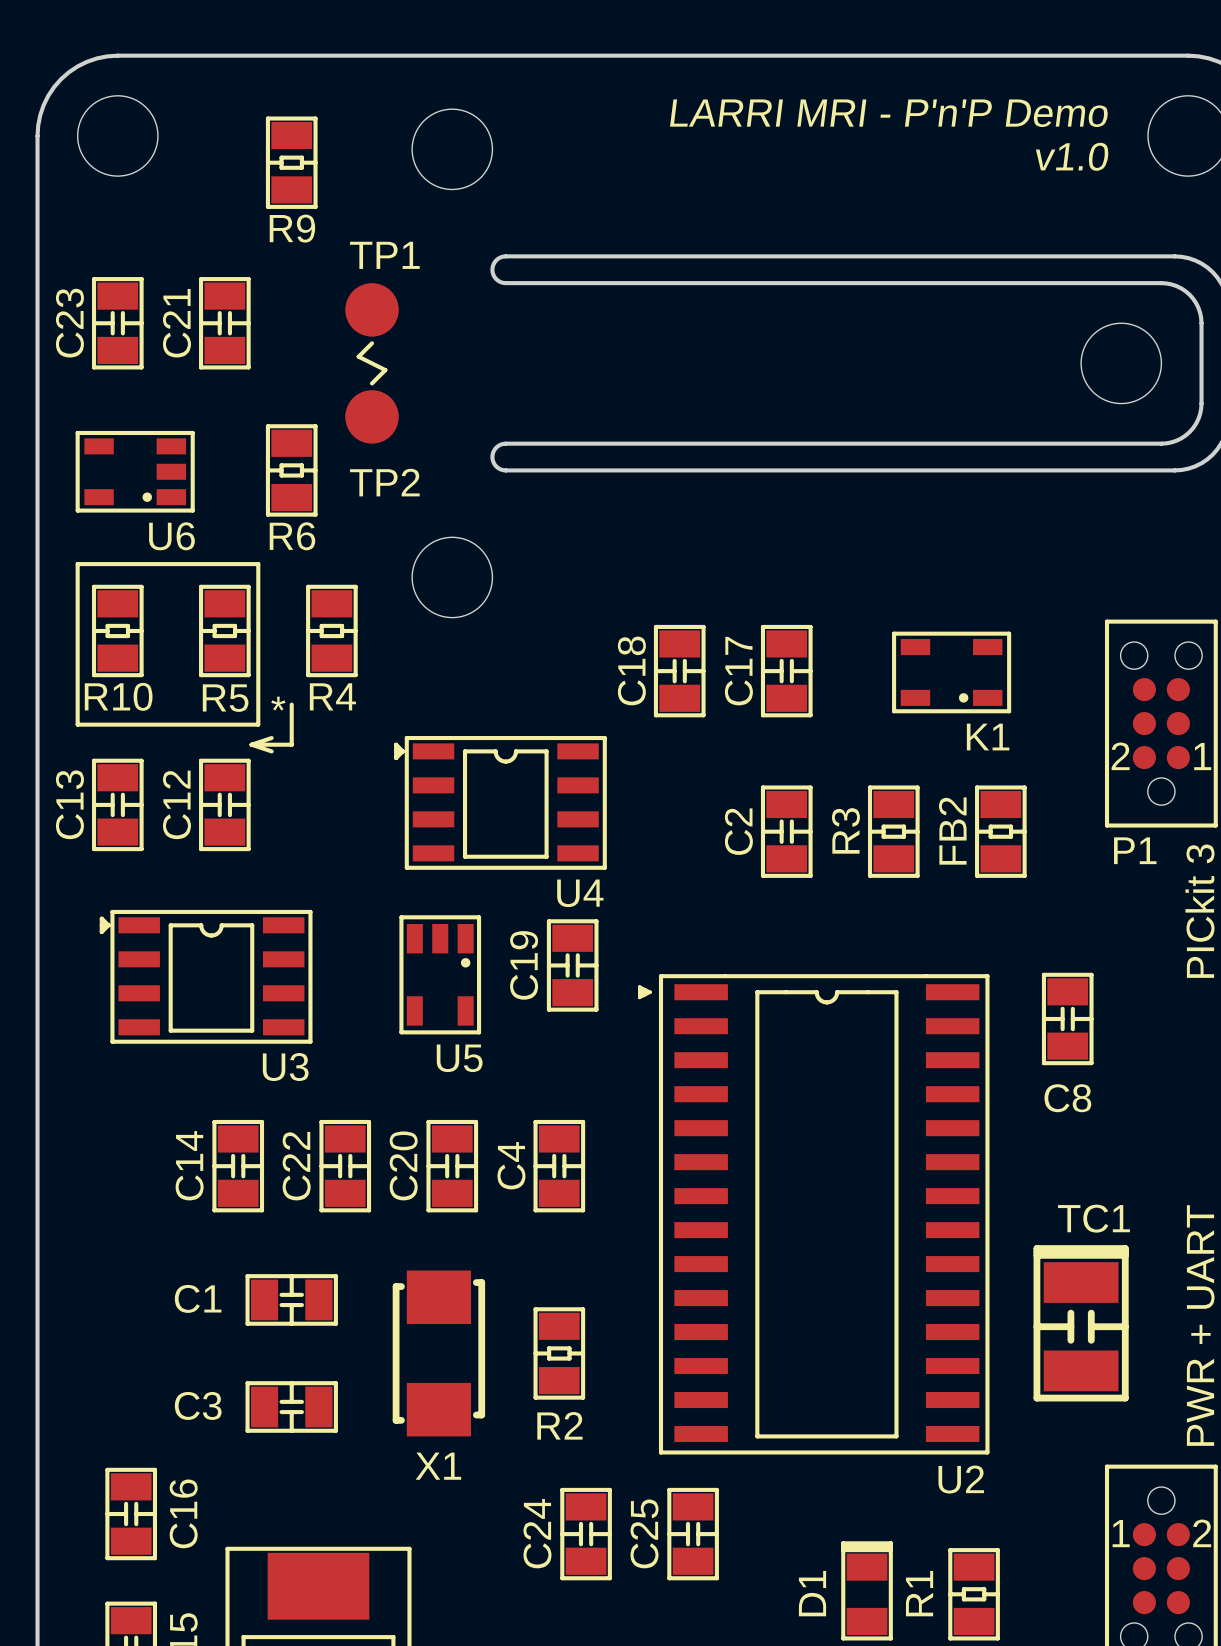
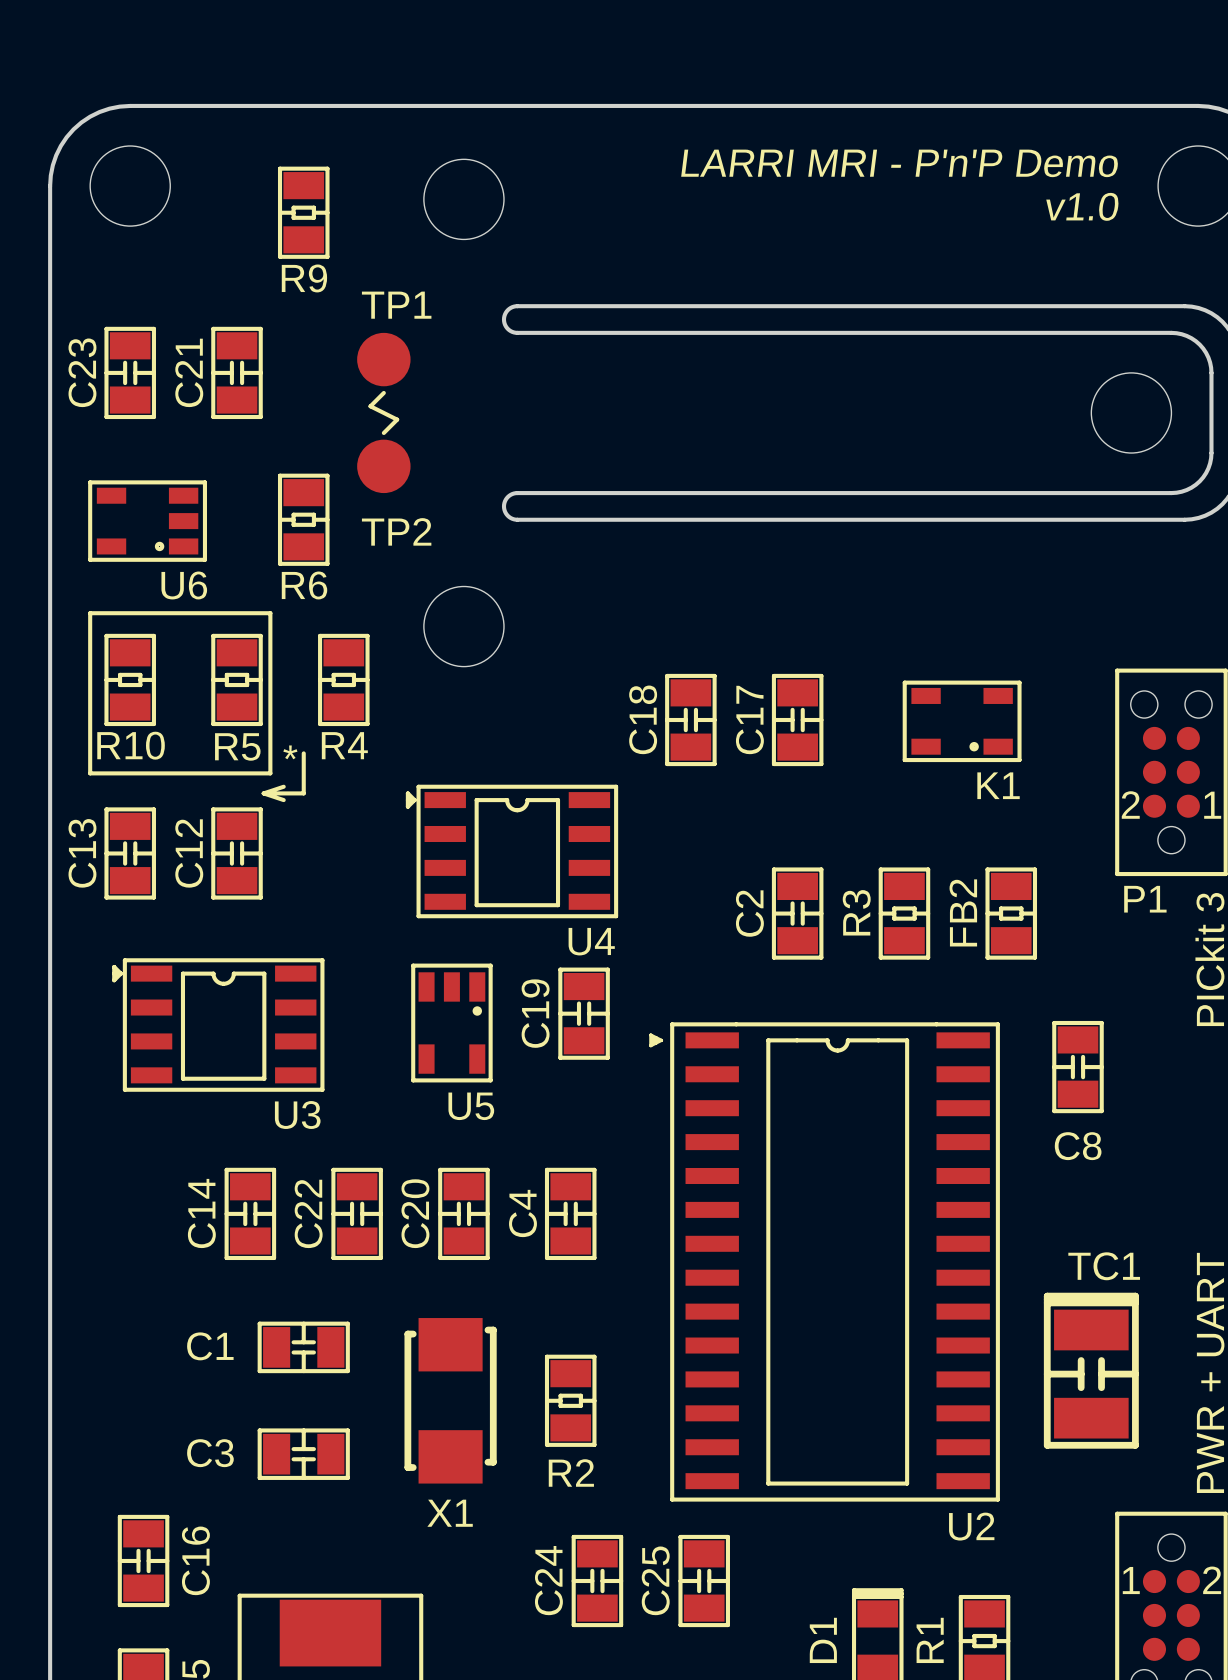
C2 position: (786, 831) -> (797, 913)
R3 position: (893, 831) -> (904, 913)
FB2 position: (1000, 831) -> (1011, 913)

